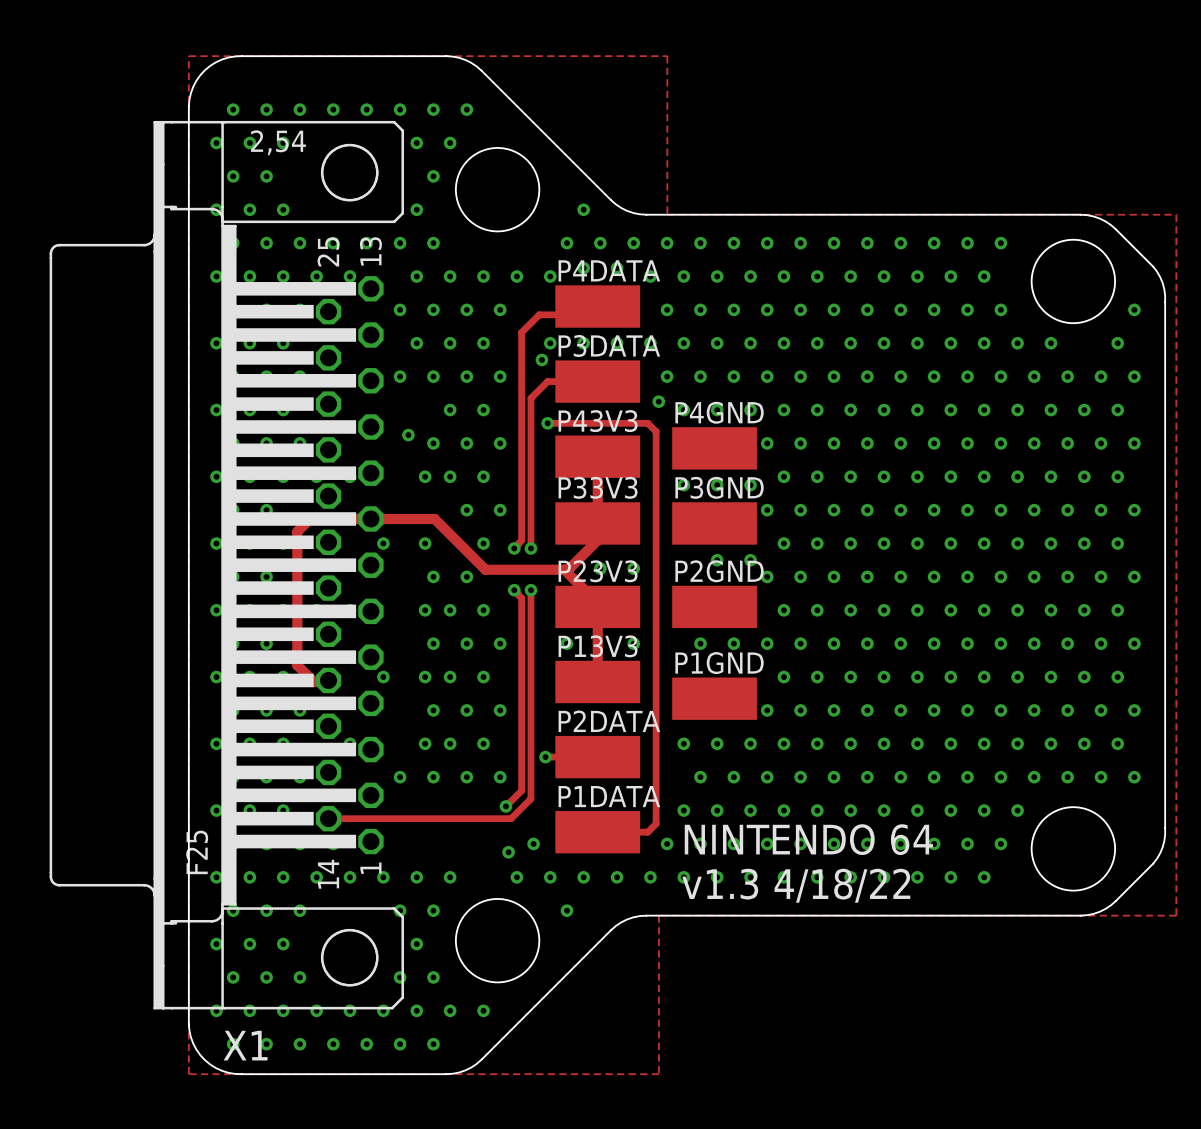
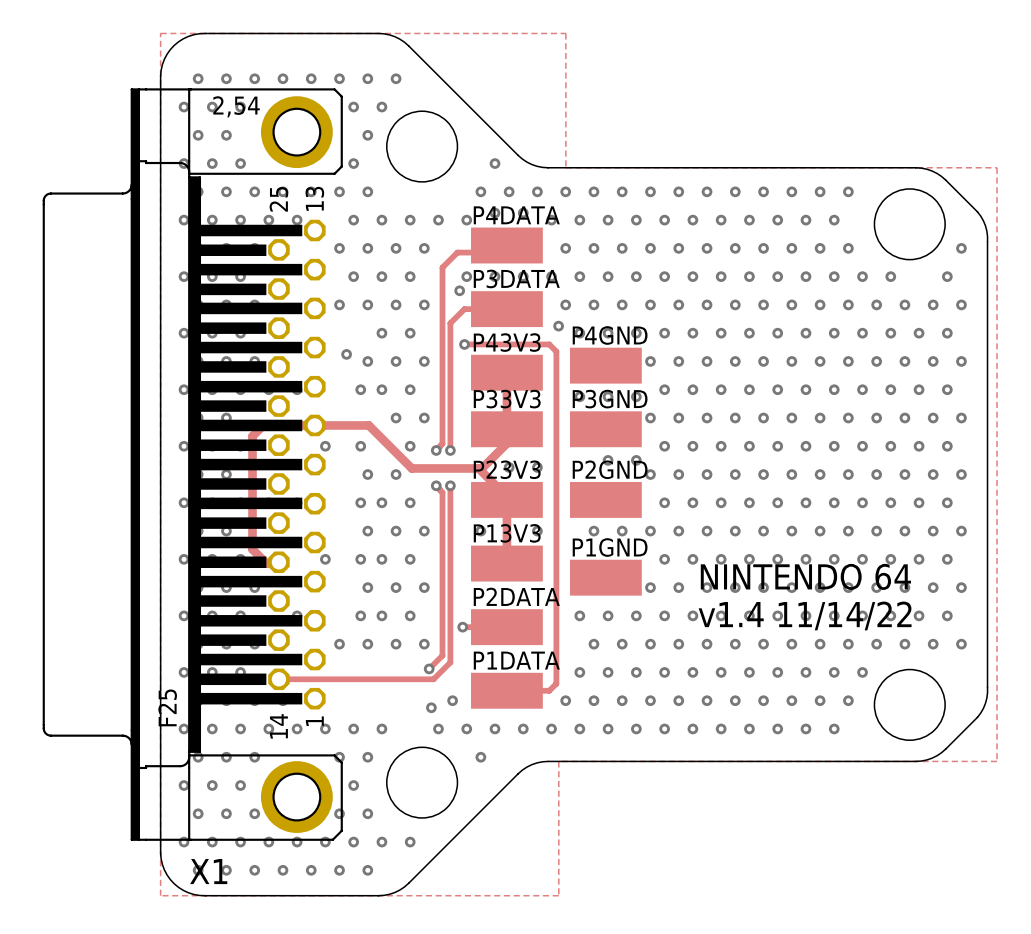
X1 footprint: [49, 120, 404, 1010] -> [42, 88, 343, 841]
text: none -> v1.4 11/14/22 (805, 615)
text position: NINTENDO 64 (808, 839) -> NINTENDO 64 (805, 576)
text: v1.3 4/18/22 (796, 885) -> none

